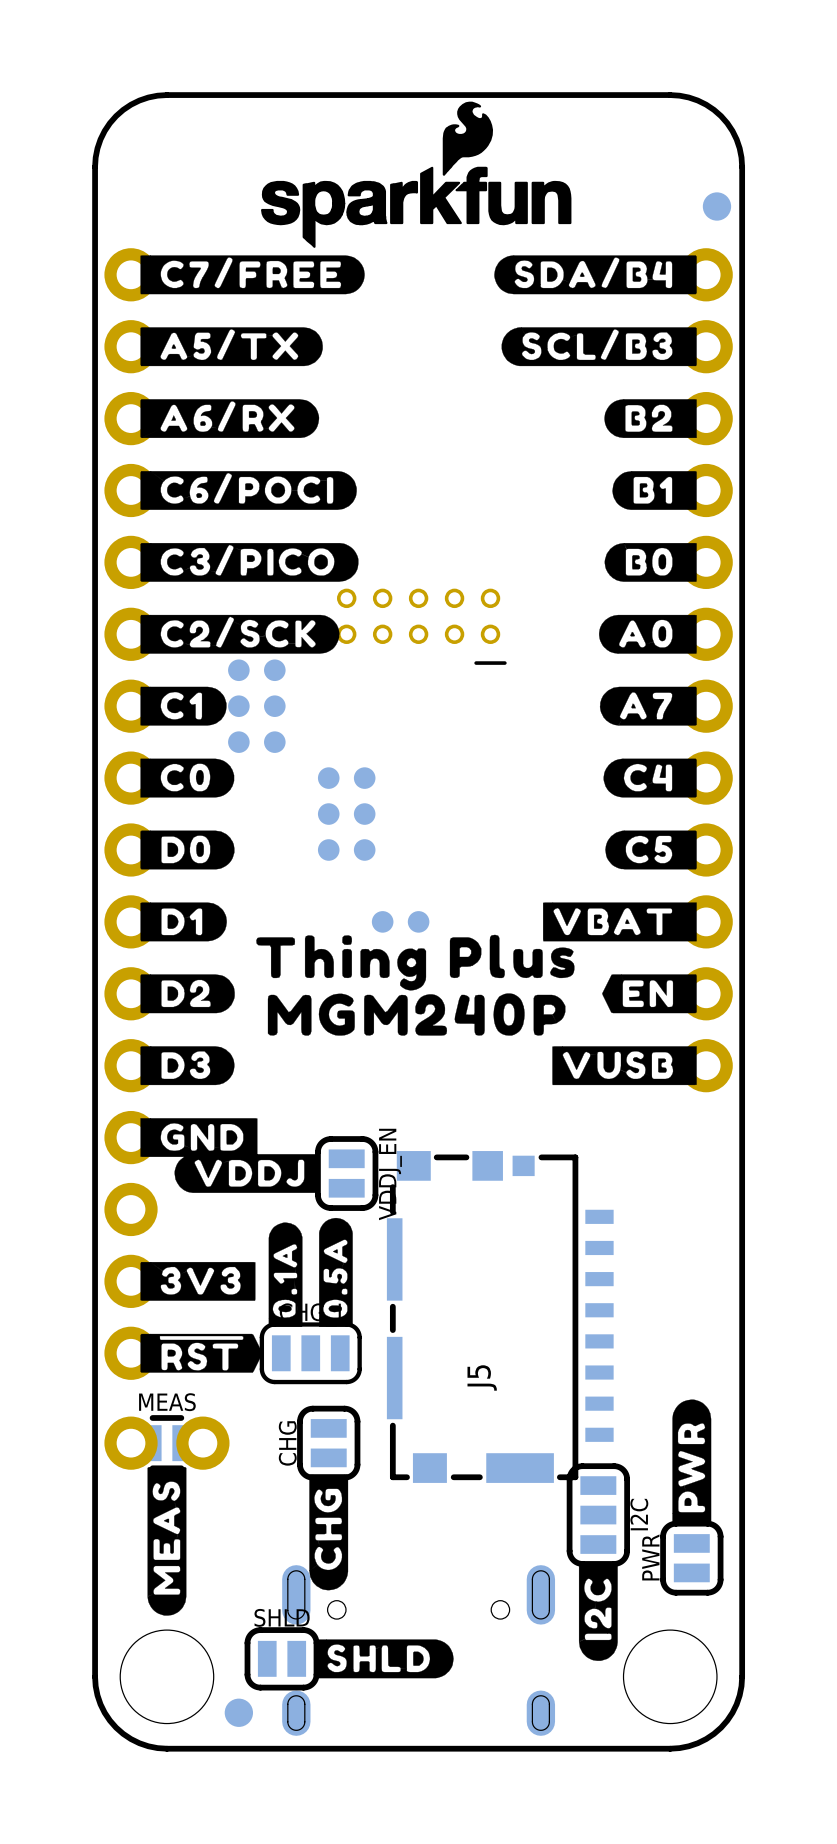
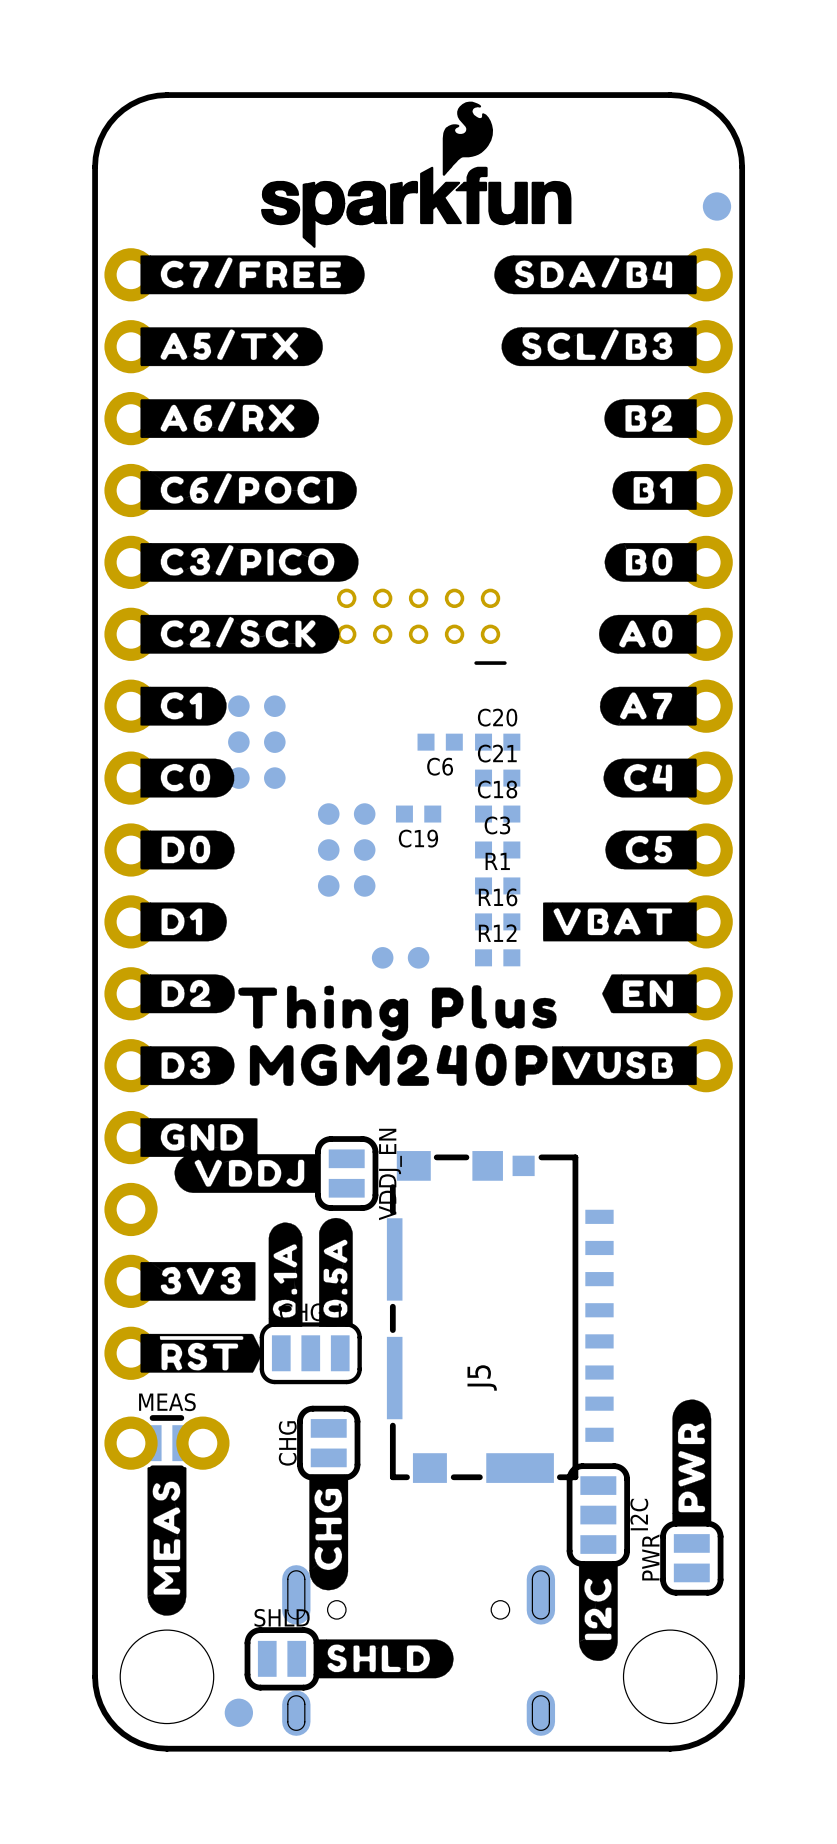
part: (238, 670) -> none
part: (274, 670) -> none
C6: none -> (440, 742)
C20: none -> (497, 742)
part: none -> (238, 778)
part: none -> (274, 778)
part: (328, 778) -> none
part: (364, 778) -> none
C21: none -> (497, 778)
C19: none -> (418, 814)
C18: none -> (497, 814)
C3: none -> (497, 849)
part: none -> (328, 885)
part: none -> (364, 885)
R1: none -> (497, 885)
part: (382, 921) -> none
part: (418, 921) -> none
R16: none -> (497, 921)
part: none -> (382, 957)
part: none -> (418, 957)
R12: none -> (497, 957)
drawing position: (415, 962) -> (397, 1012)
drawing position: (416, 1014) -> (398, 1064)

